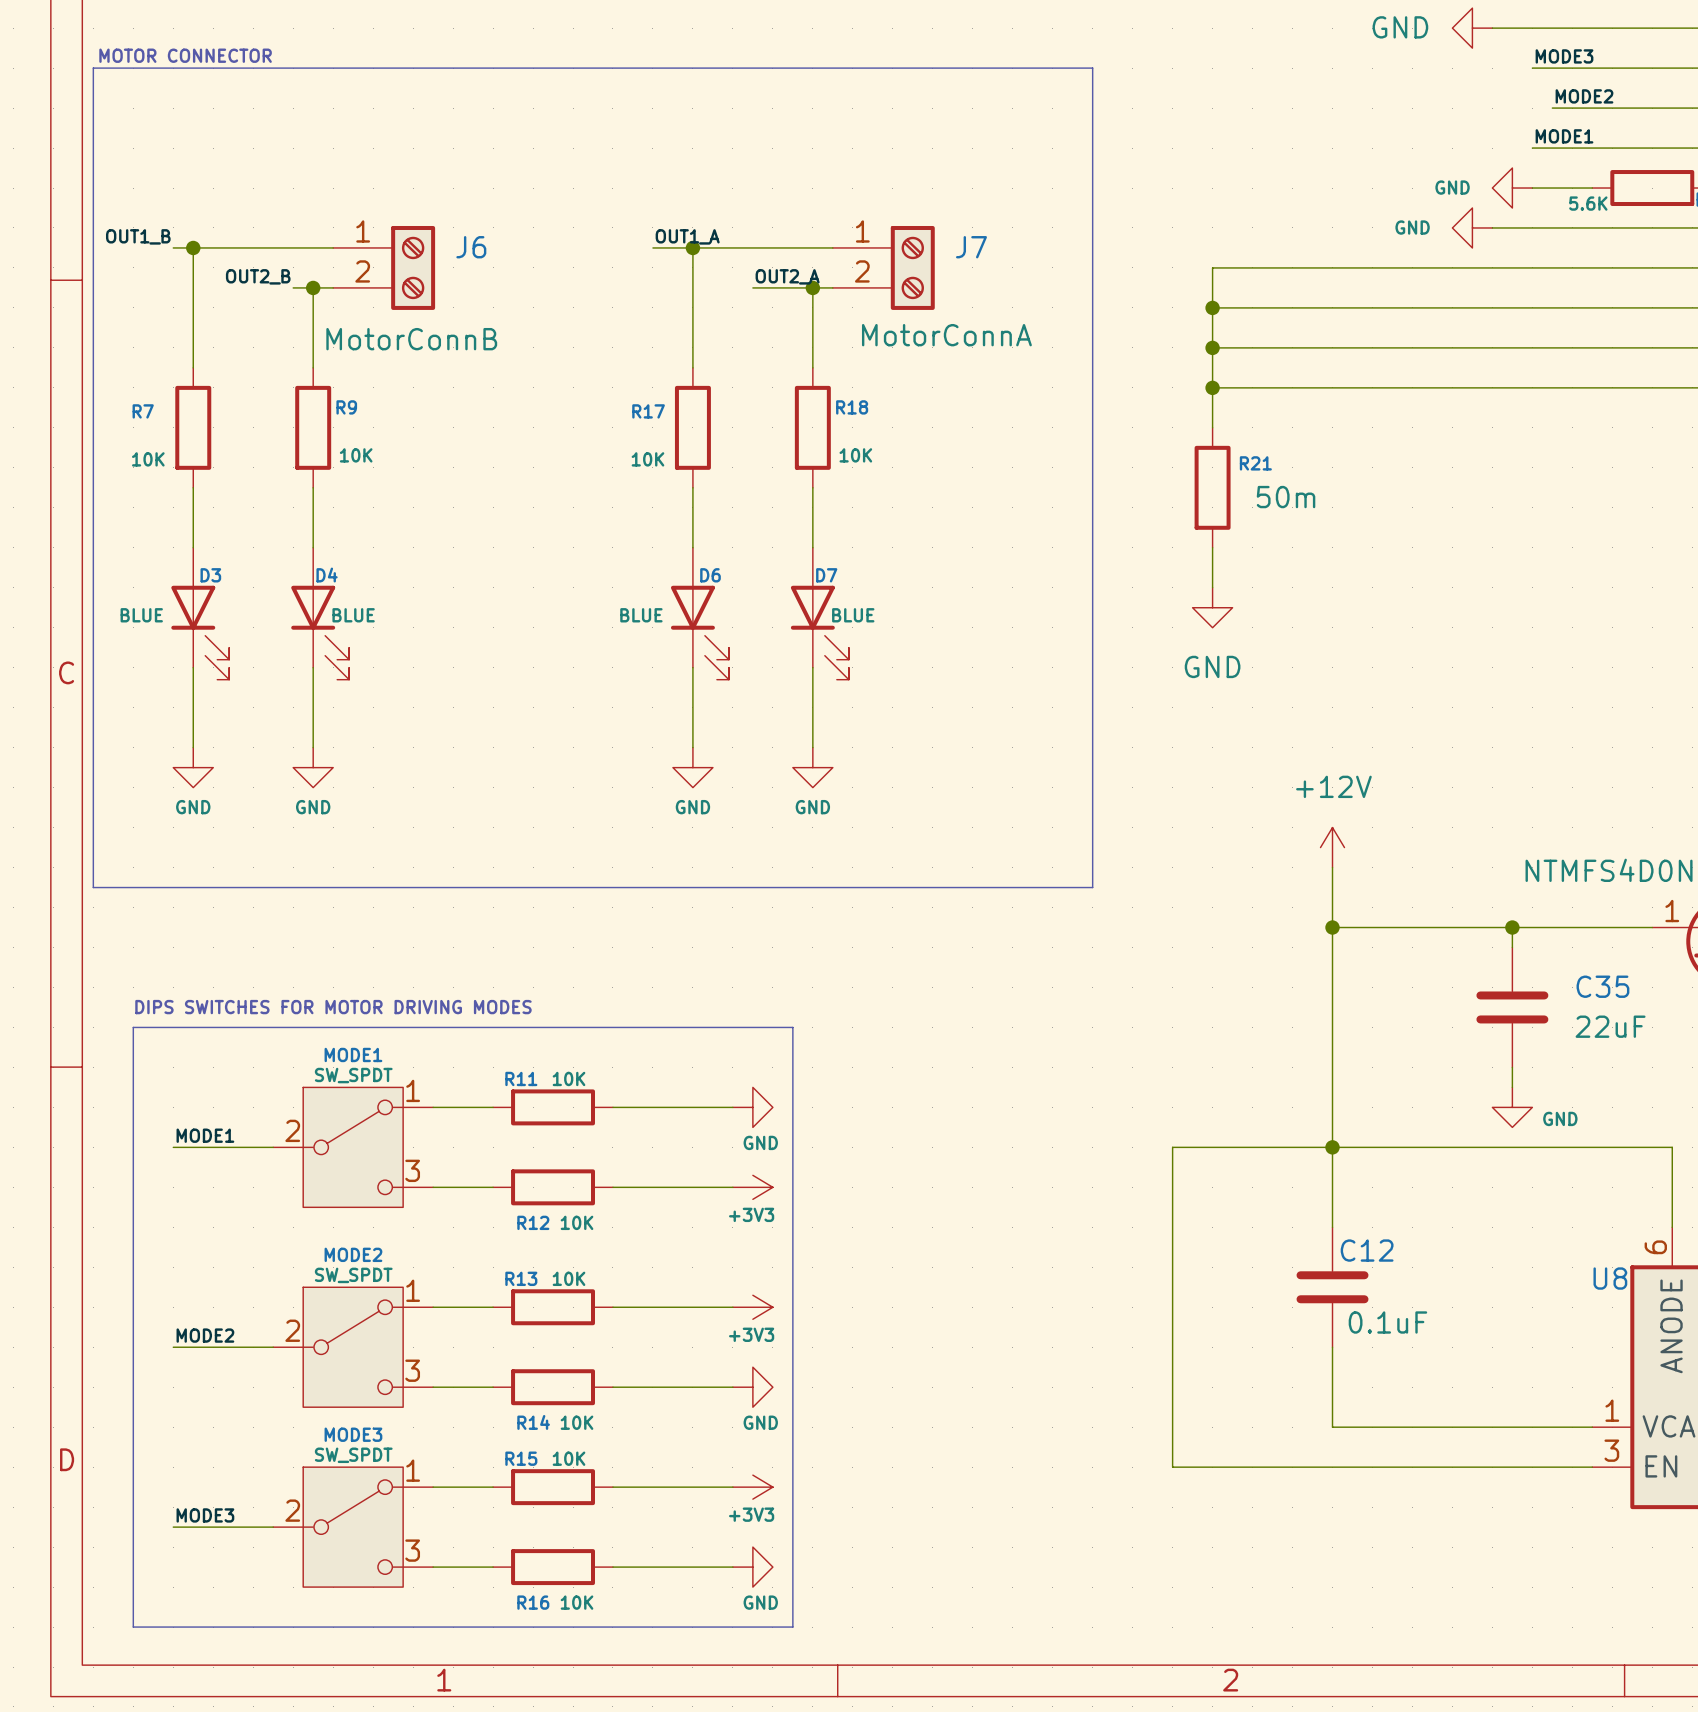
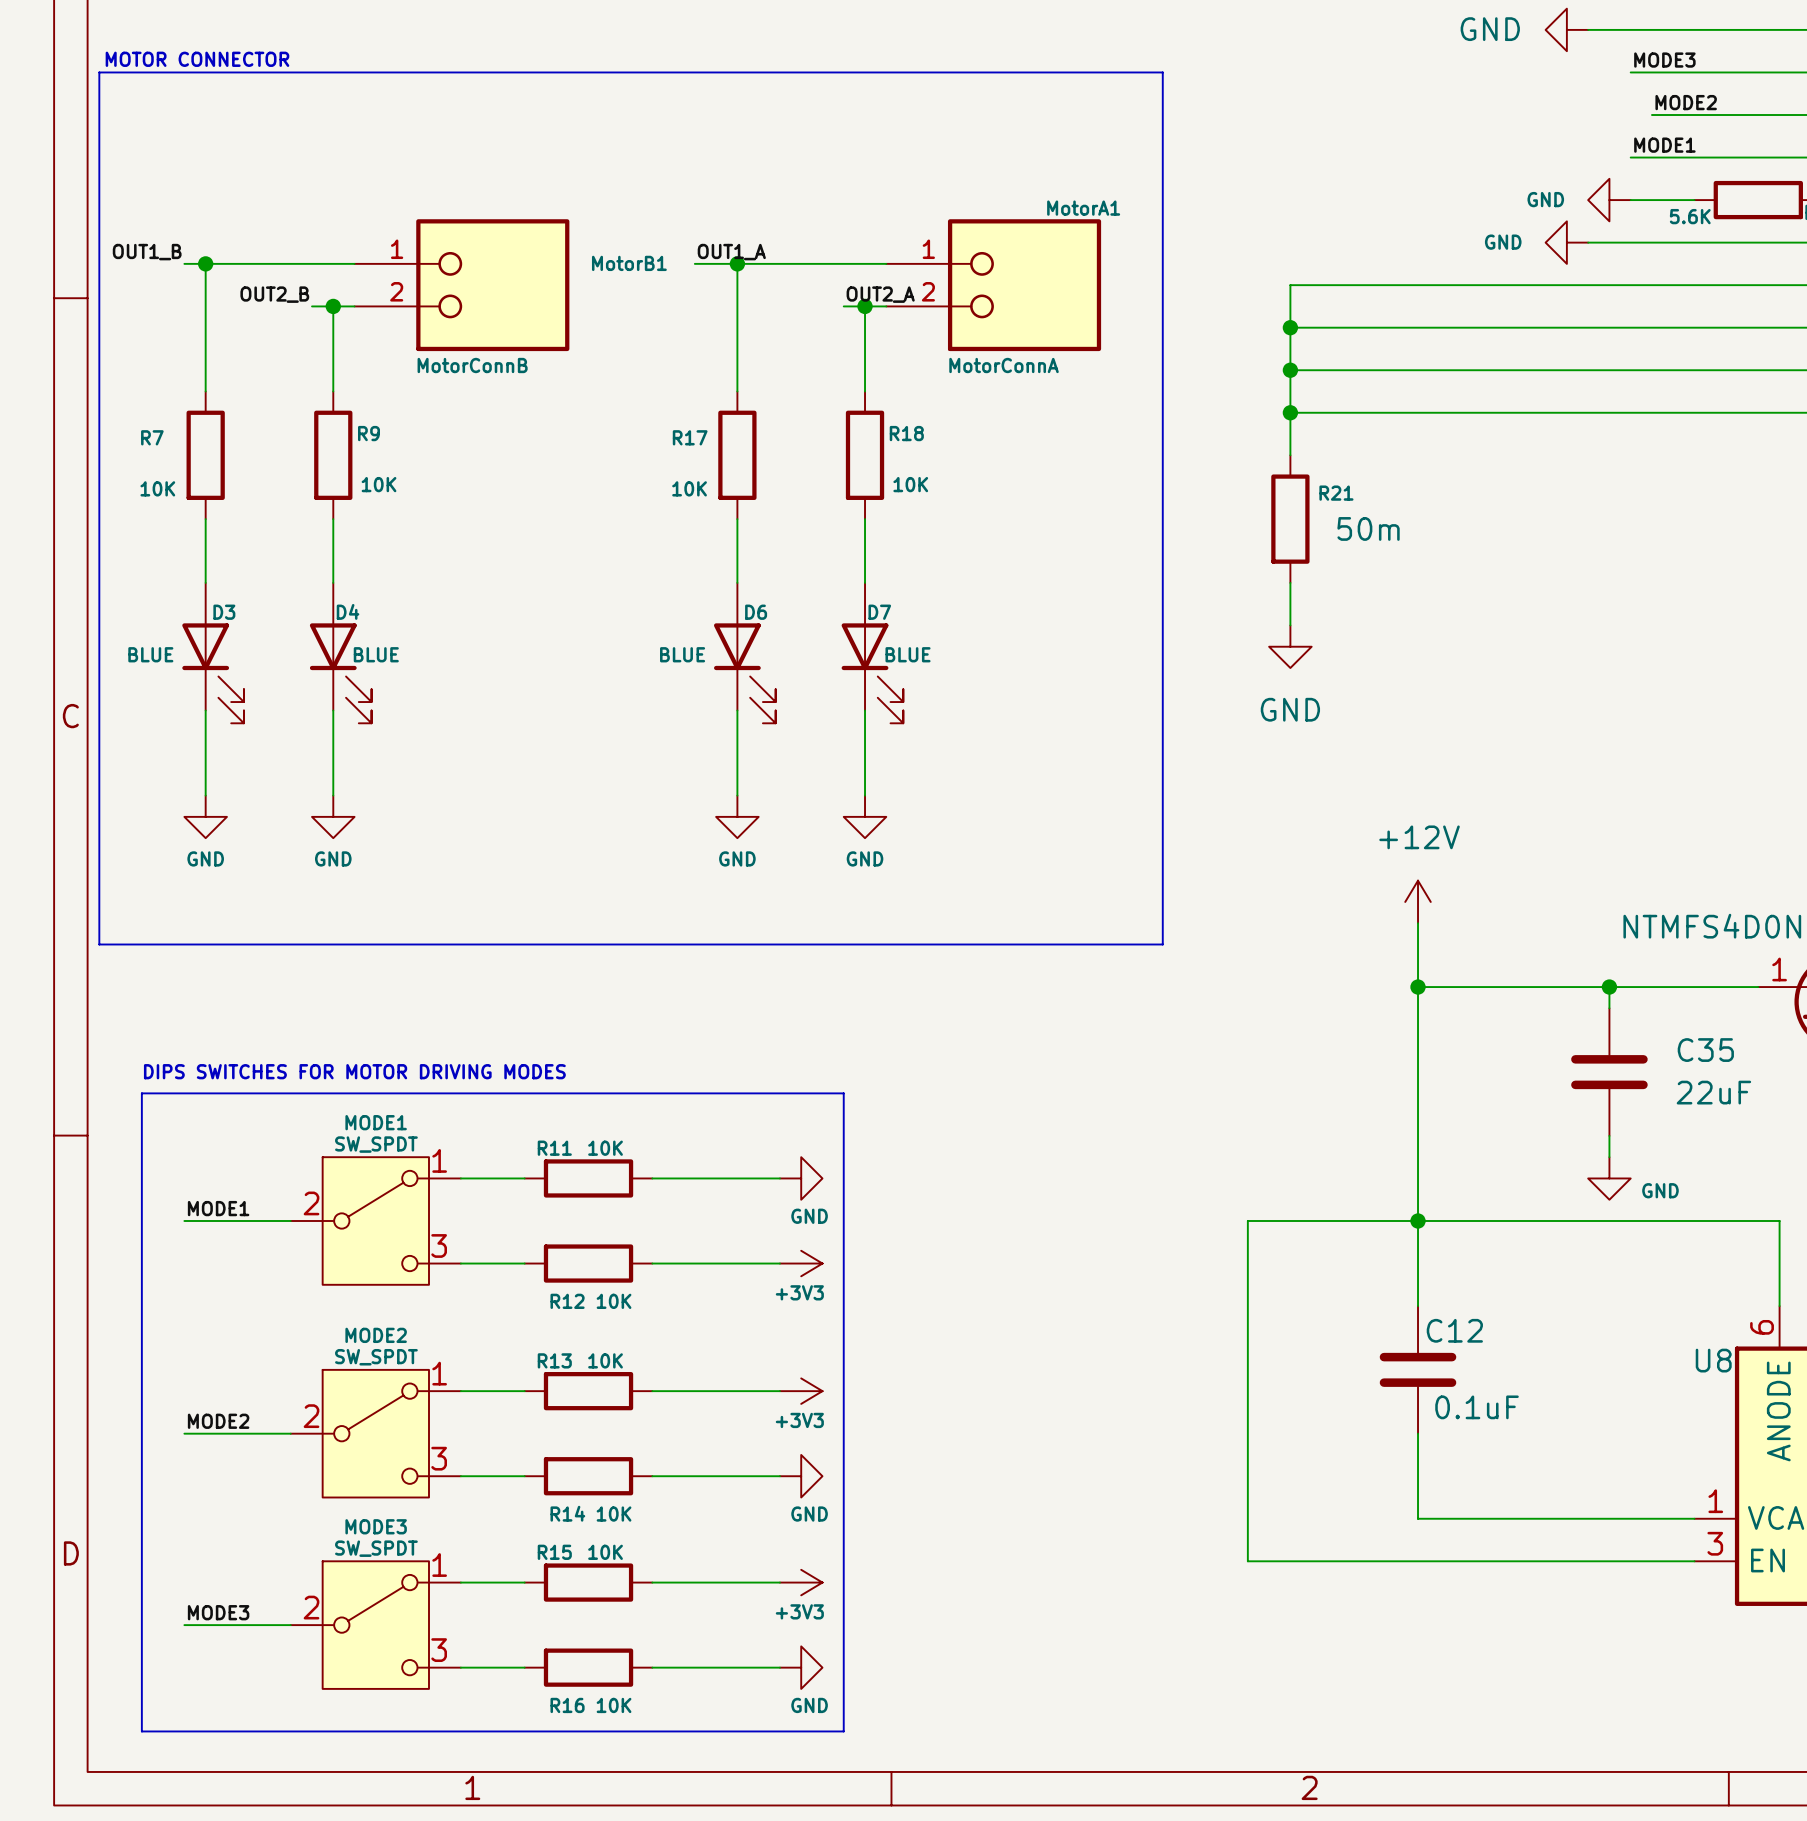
J6: MotorConnB (384, 267) -> none
MotorB1: none -> MotorConnB (461, 285)
J7: MotorConnA (883, 267) -> none
MotorA1: none -> MotorConnA (993, 285)
label position: OUT2_A (787, 276) -> OUT2_A (880, 294)
wire: (752, 287) (792, 287) -> none

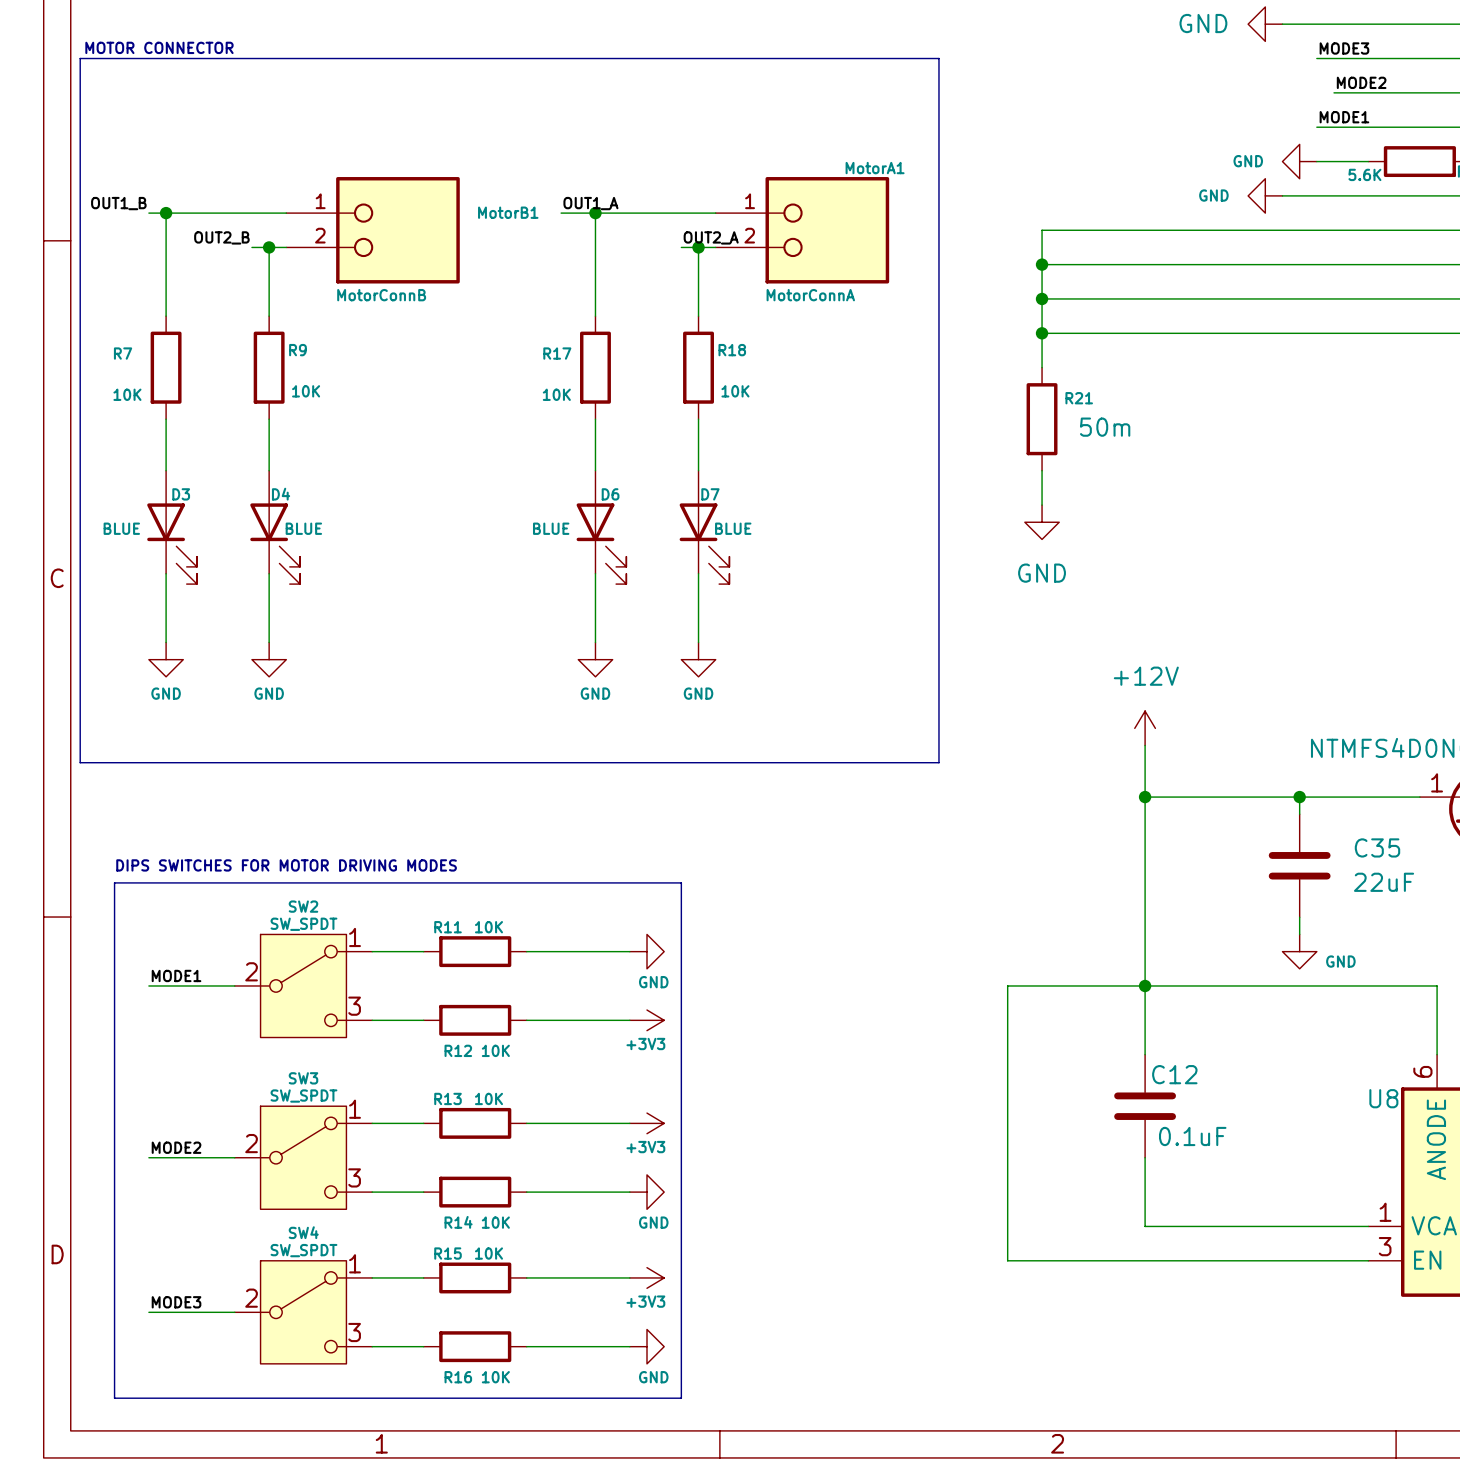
MODE1 name: MODE1 (376, 1122) -> SW2 (303, 906)
MODE2 name: MODE2 (376, 1335) -> SW3 (303, 1078)
MODE3 name: MODE3 (376, 1526) -> SW4 (303, 1232)

